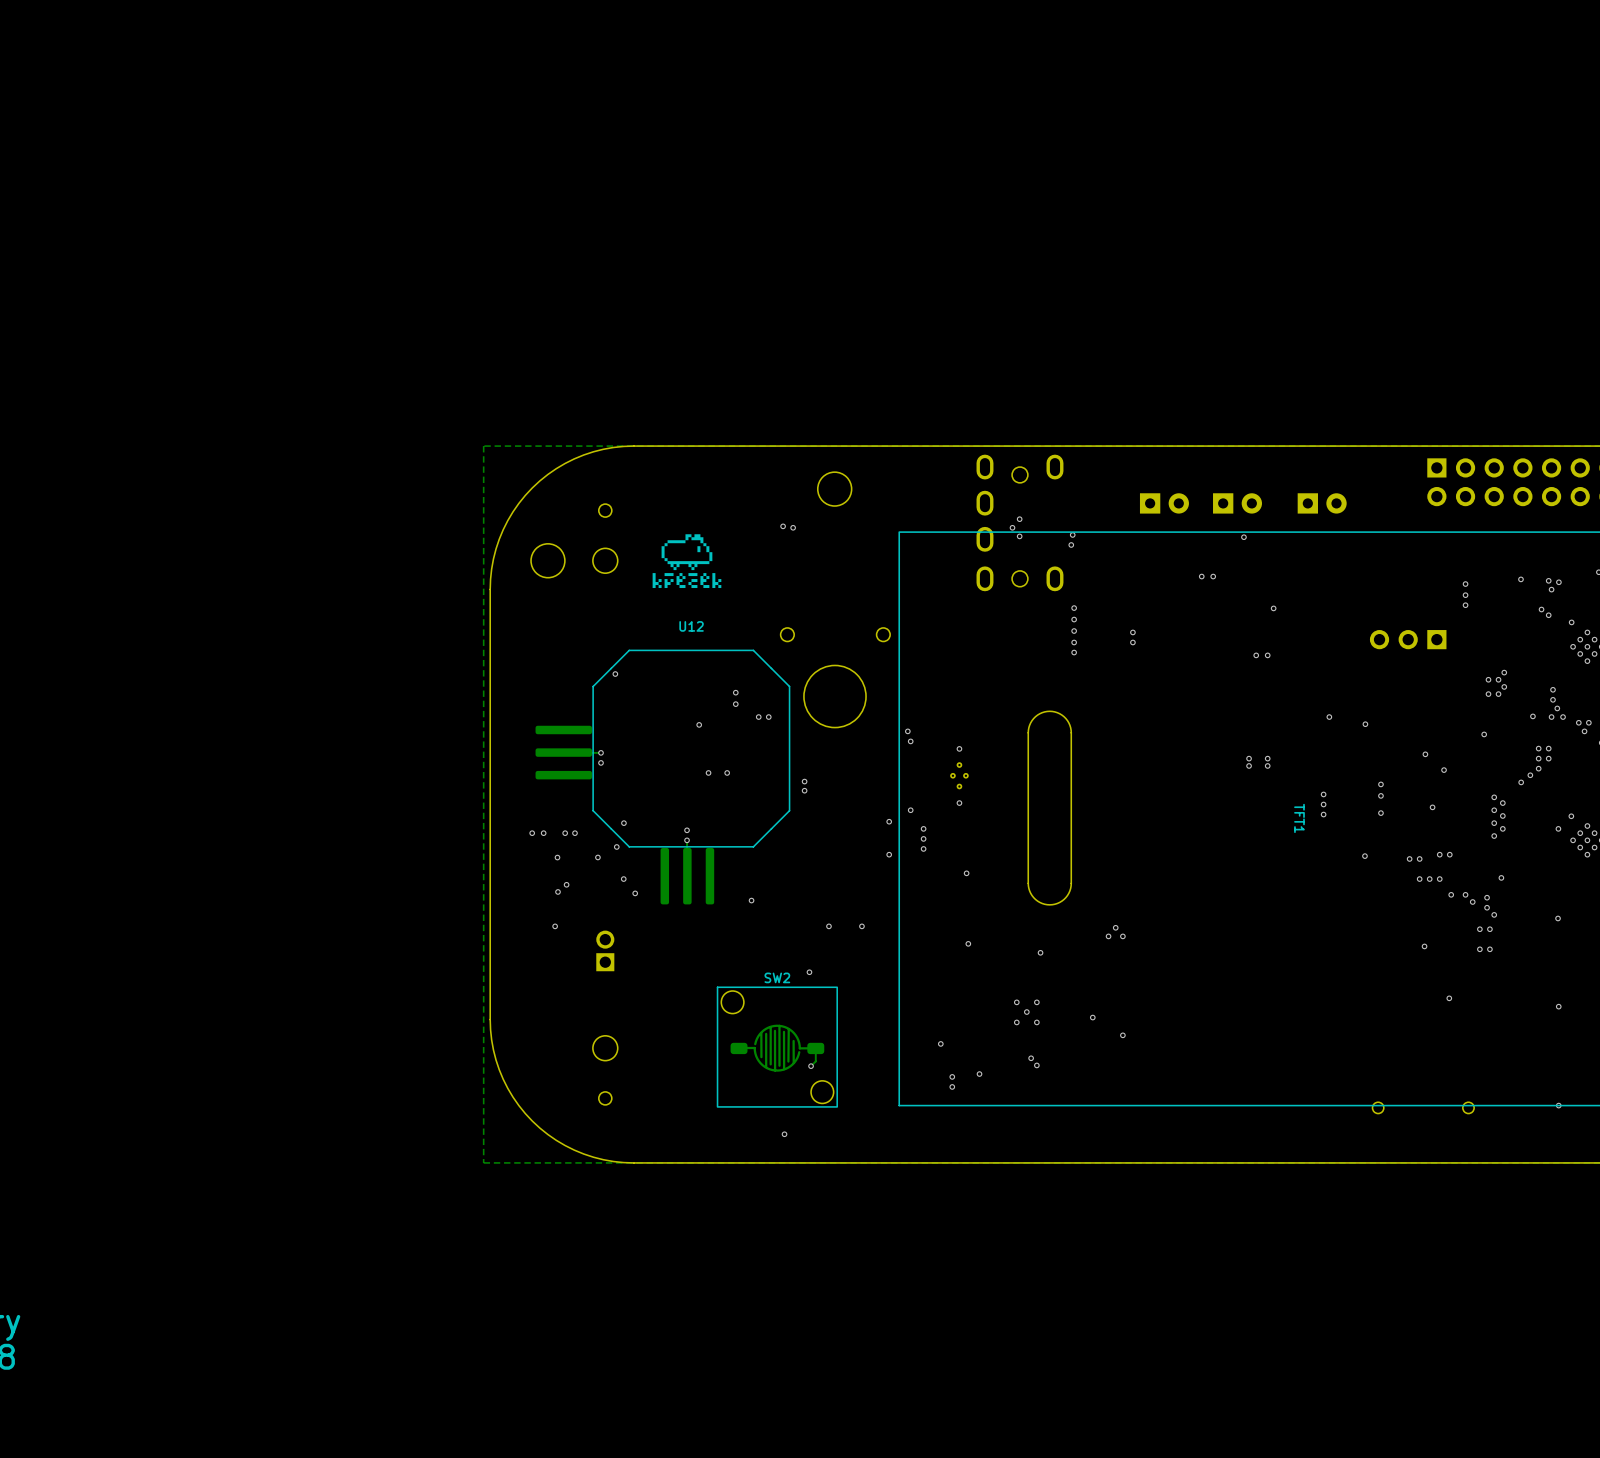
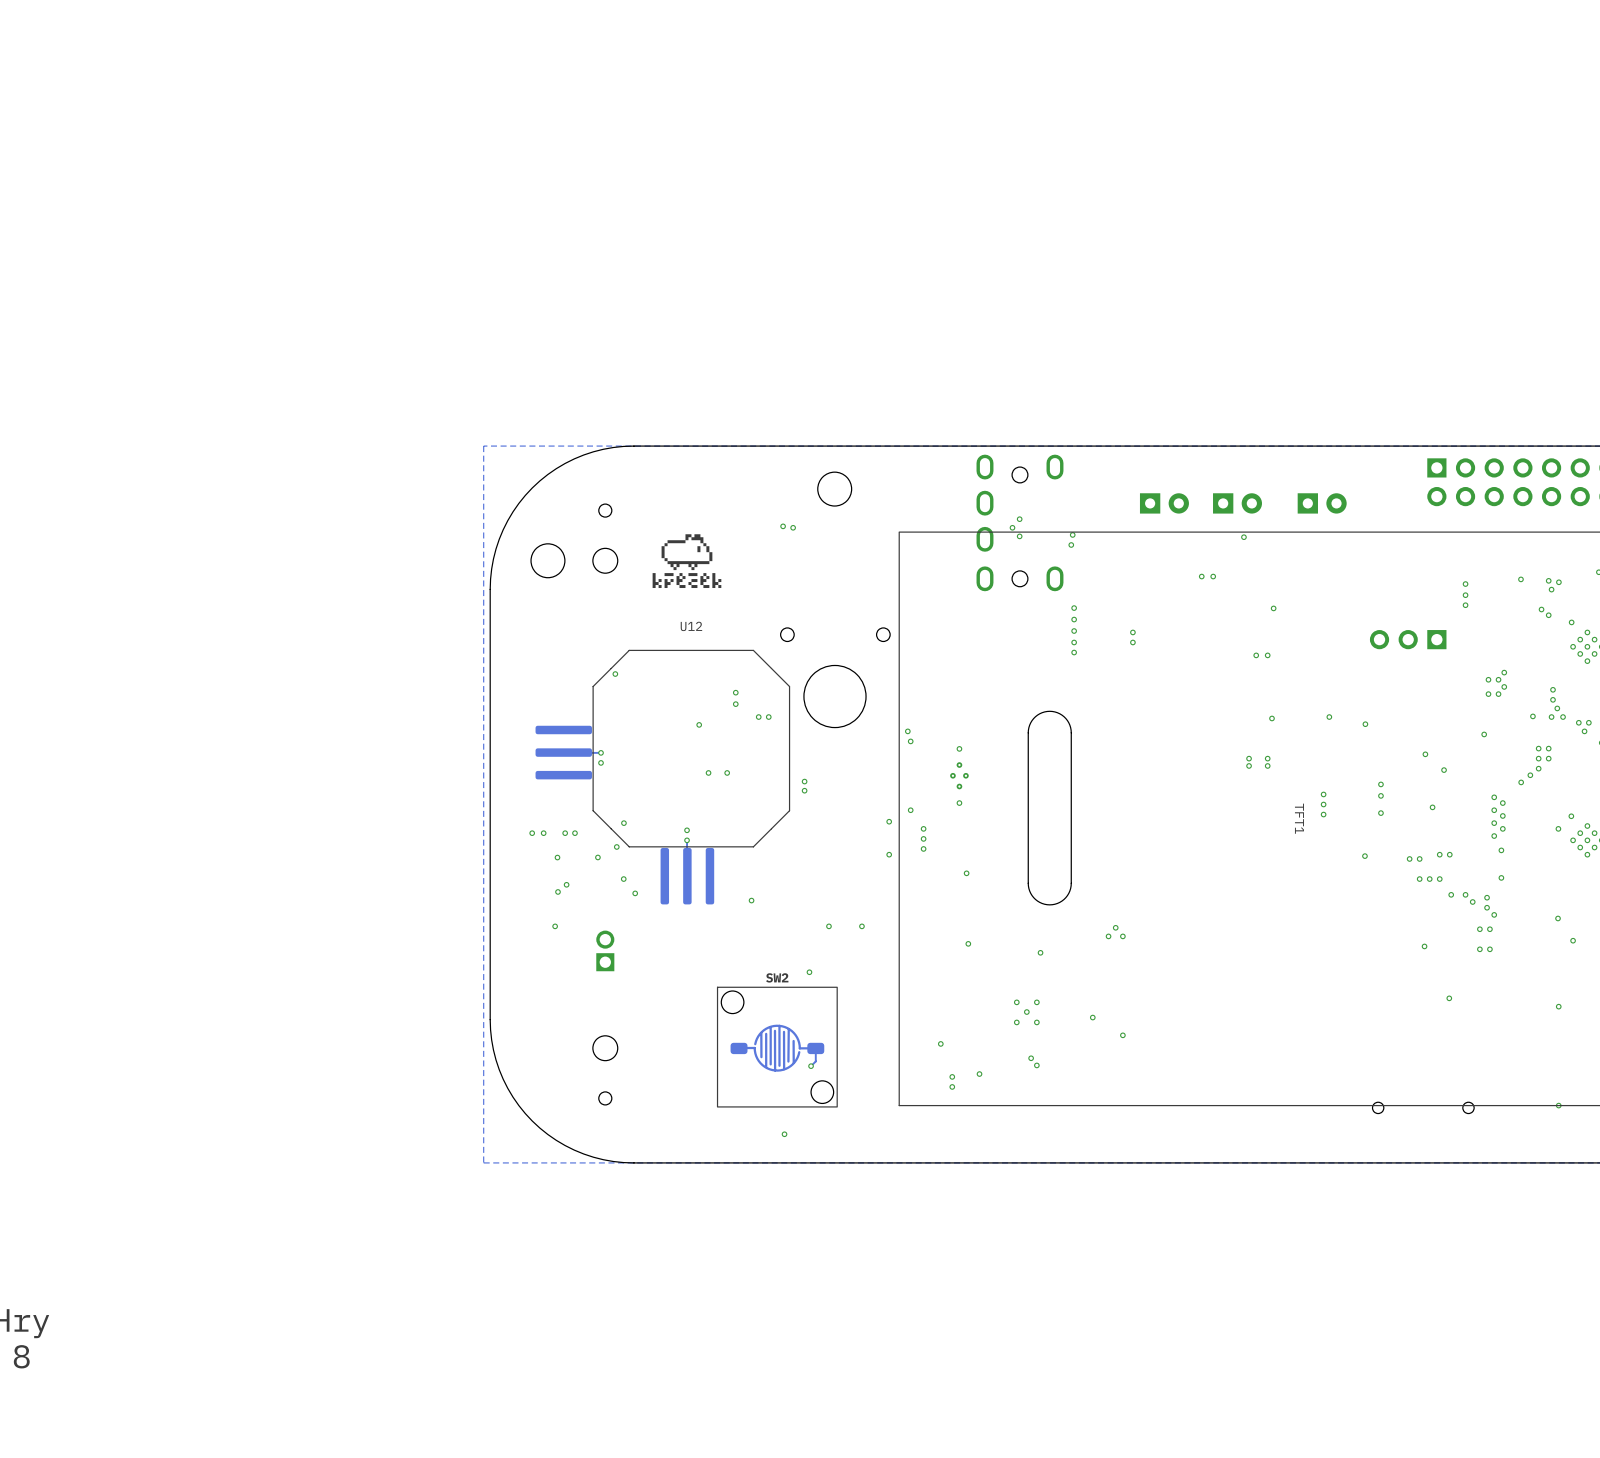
via: none -> (1271, 718)
via: none -> (1501, 850)
via: none -> (1573, 940)

